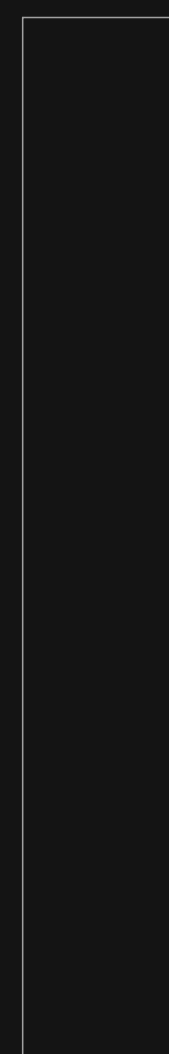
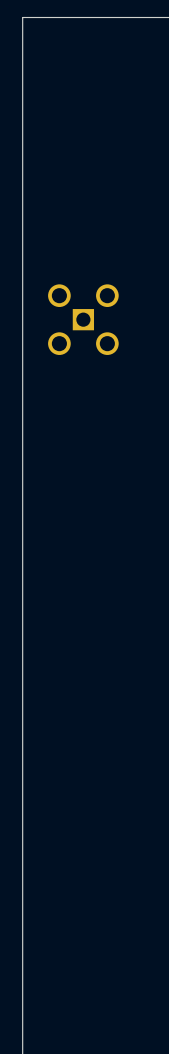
part: none -> (83, 319)

